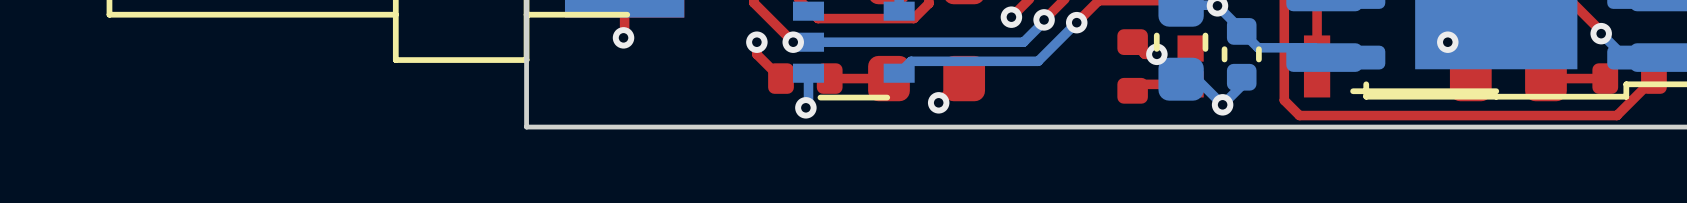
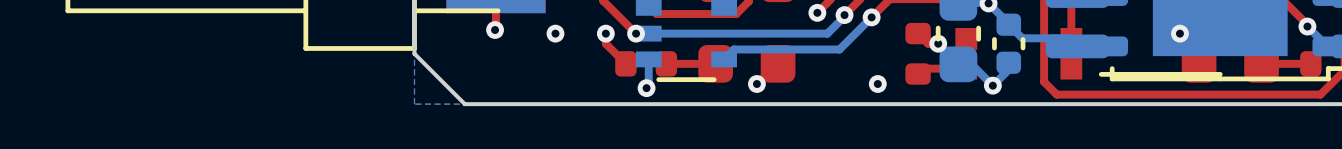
via: none -> (555, 33)
board edge: (526, 66) (526, 127) (587, 127) -> (414, 53) (464, 104)
via: none -> (877, 84)

